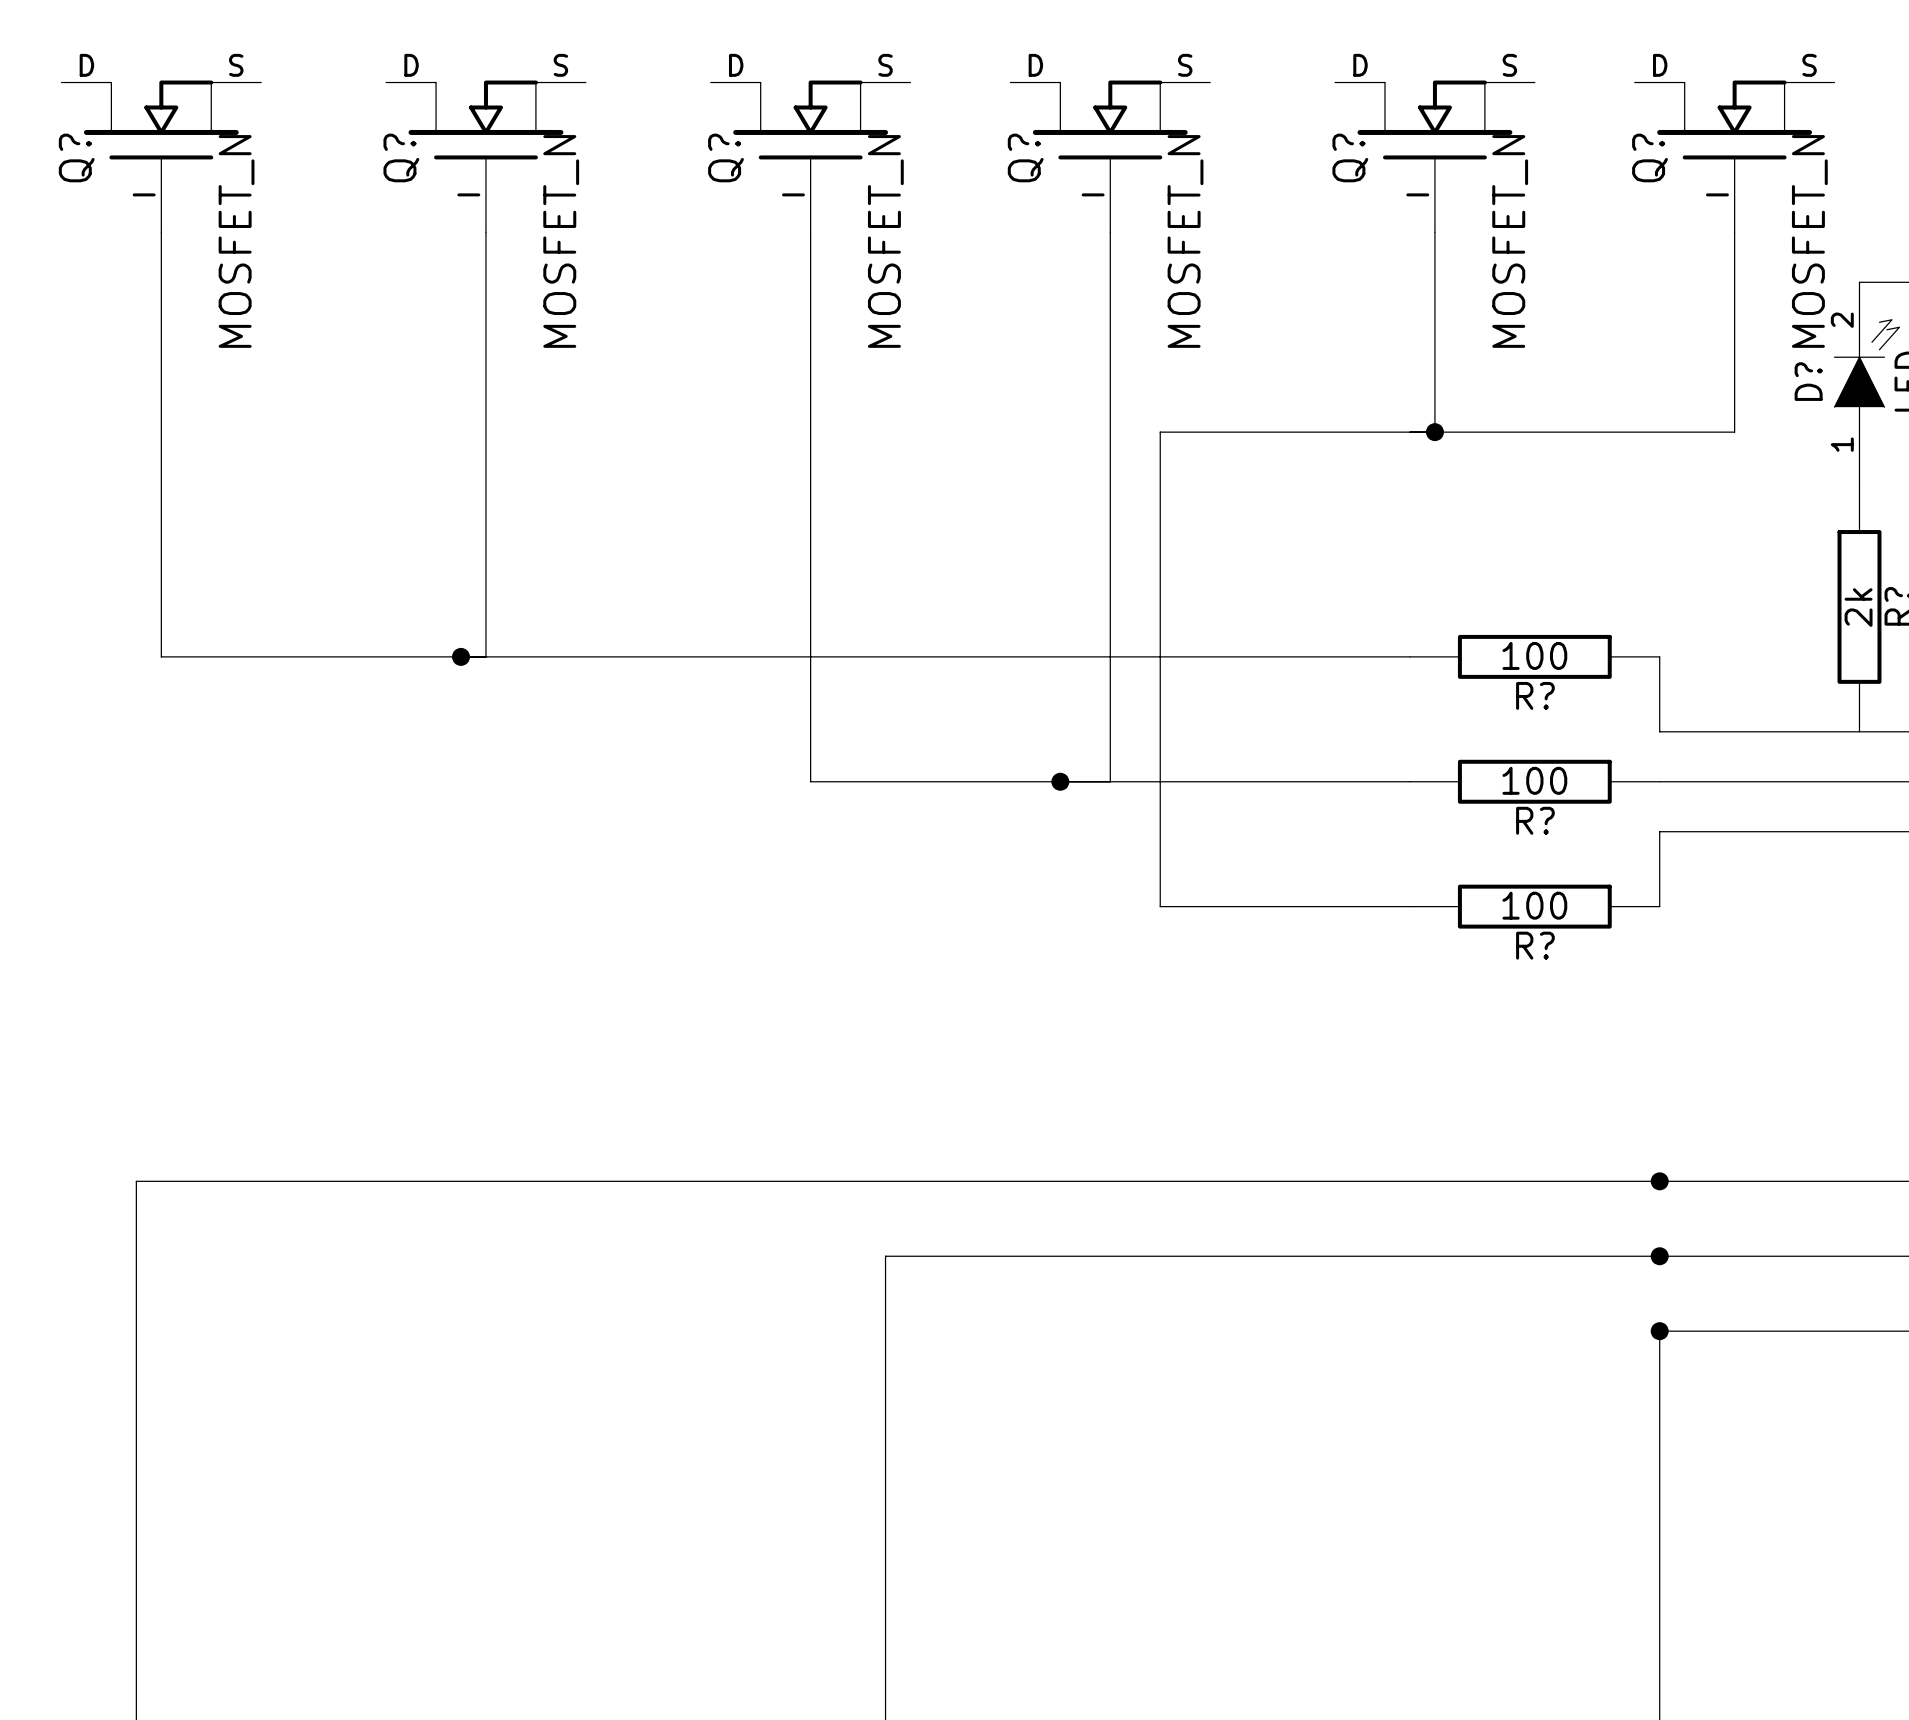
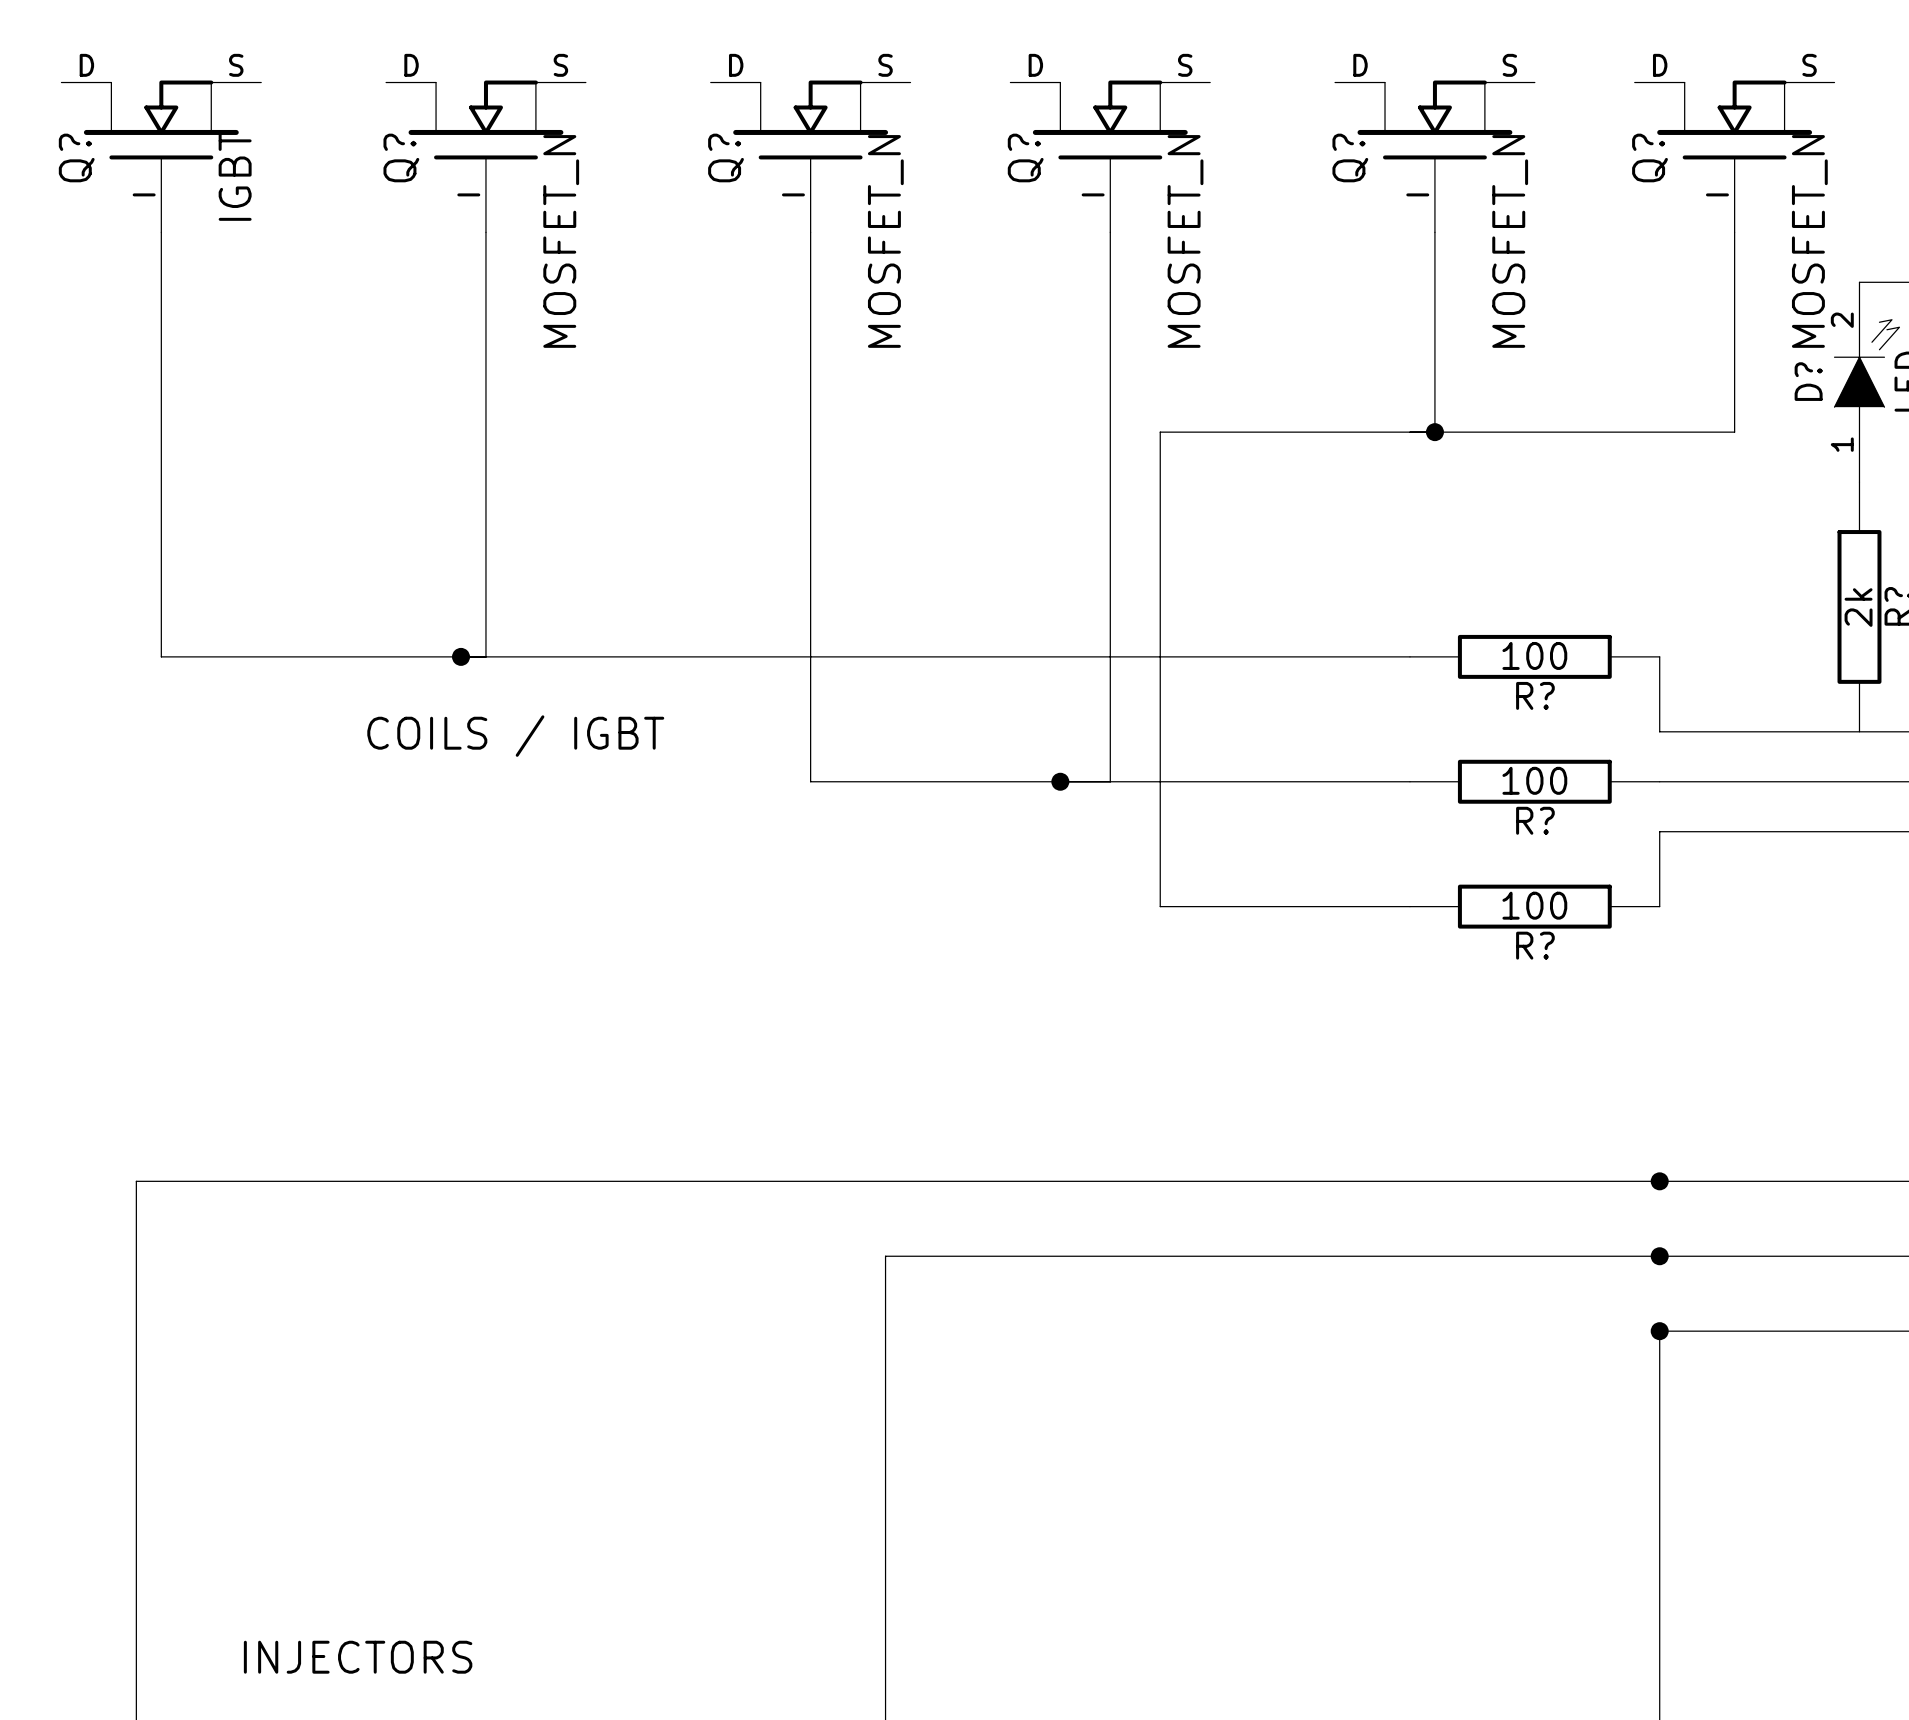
Q? value: MOSFET_N (236, 241) -> IGBT (235, 175)
text: none -> COILS / IGBT (515, 736)
text: none -> INJECTORS (358, 1657)

